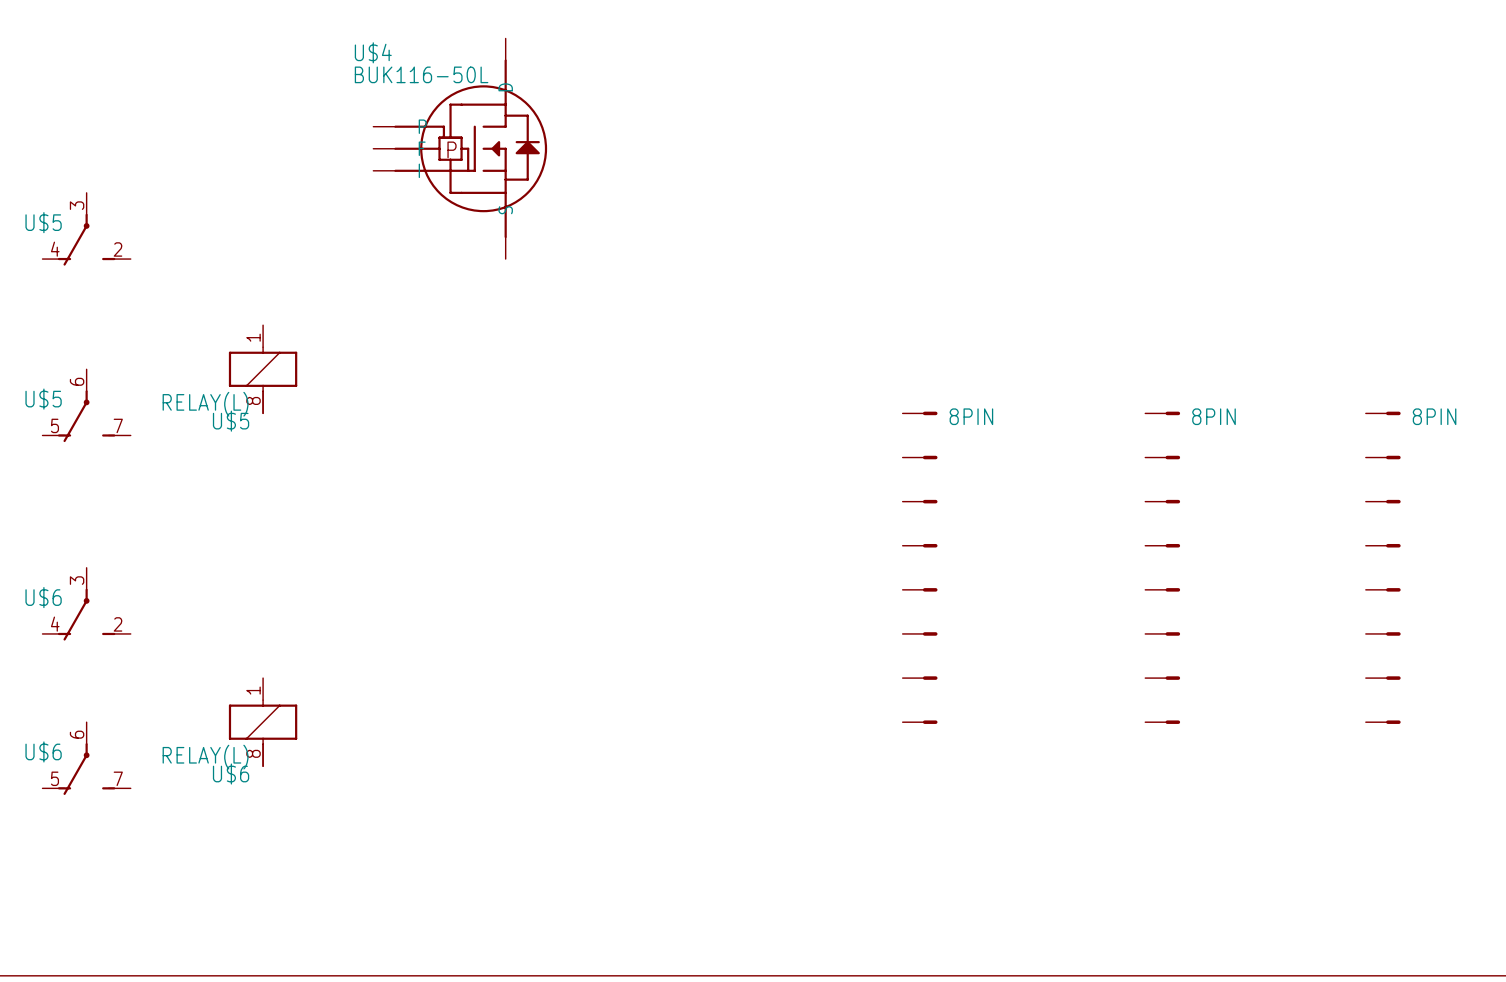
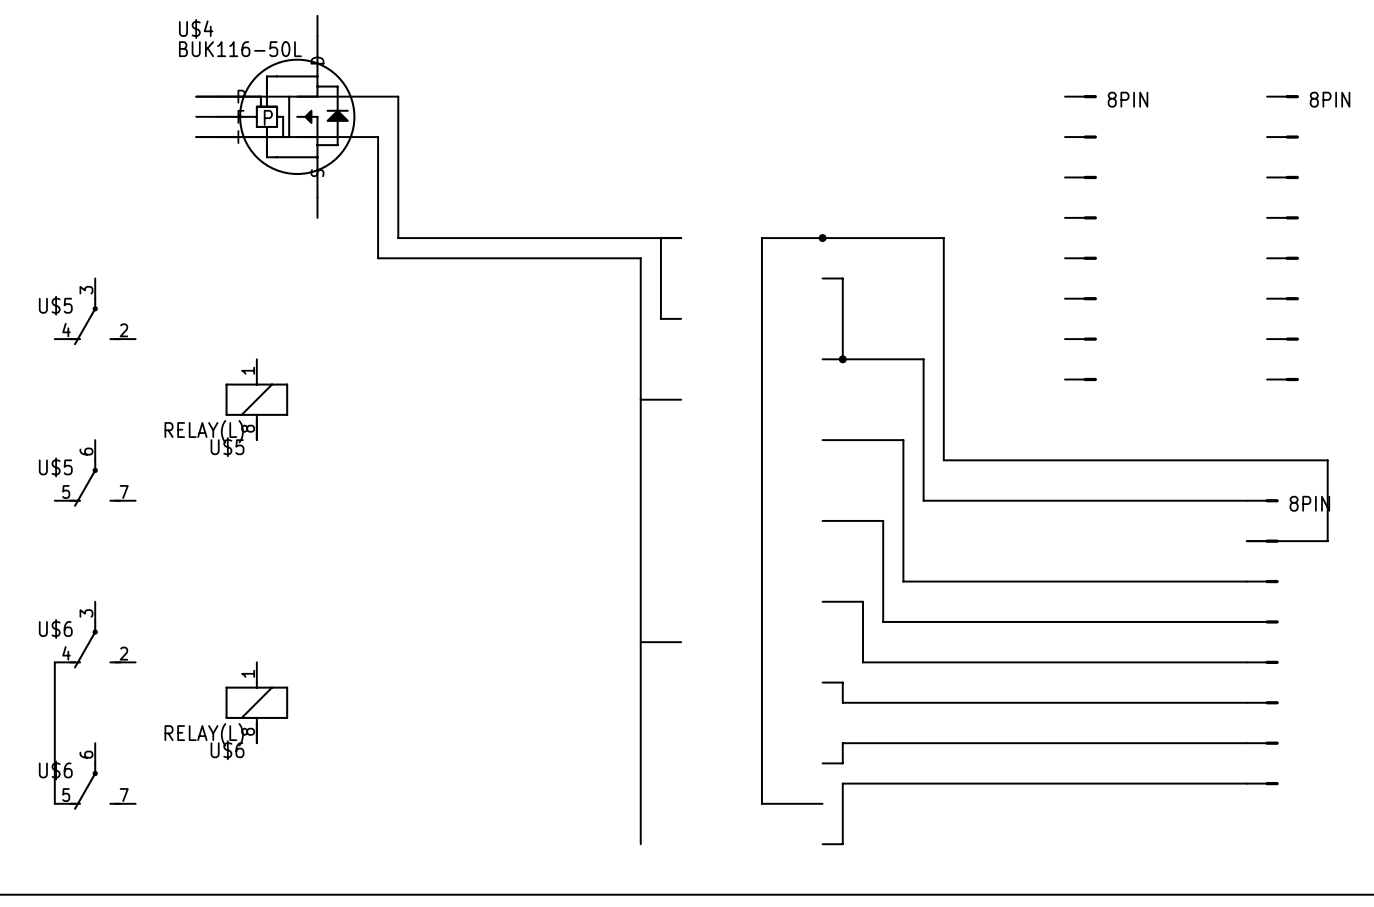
wire: none -> (196, 96) (398, 96) (398, 238) (681, 238)
part: none -> 8PIN (1081, 96)
part: none -> 8PIN (1283, 96)
wire: none -> (196, 137) (378, 137) (378, 258) (640, 258) (640, 399) (681, 399)
U$4 position: (460, 148) -> (275, 116)
part: none -> (1081, 137)
part: none -> (1283, 137)
part: none -> (1081, 177)
part: none -> (1283, 177)
U$5 position: (86, 229) -> (95, 311)
part: none -> (1081, 217)
part: none -> (1283, 217)
wire: none -> (660, 238) (660, 318) (681, 318)
junction: none -> (822, 238)
part: none -> (1081, 258)
part: none -> (1283, 258)
wire: none -> (822, 278) (842, 278) (842, 359)
part: none -> (1081, 298)
part: none -> (1283, 298)
U$5 position: (263, 369) -> (256, 400)
part: none -> (1081, 339)
part: none -> (1283, 339)
wire: none -> (822, 359) (923, 359) (923, 500) (1246, 500)
junction: none -> (842, 359)
U$5 position: (86, 405) -> (95, 473)
part: 8PIN (920, 413) -> none
part: 8PIN (1162, 413) -> none
part: none -> (1081, 379)
part: 8PIN (1383, 413) -> none
part: none -> (1283, 379)
bus: none -> (640, 399) (640, 844)
part: (920, 457) -> none
part: (1162, 457) -> none
part: (1383, 457) -> none
wire: none -> (822, 440) (903, 440) (903, 581) (1246, 581)
part: (920, 501) -> none
part: (1162, 501) -> none
part: (1383, 501) -> none
part: (920, 545) -> none
part: (1162, 545) -> none
part value: none -> 8PIN (1309, 503)
wire: none -> (822, 520) (883, 520) (883, 621) (1246, 621)
part: (920, 589) -> none
part: (1162, 589) -> none
wire: none -> (1246, 541) (1327, 541) (1327, 460) (943, 460) (943, 238) (761, 238) (761, 803) (822, 803)
U$6 position: (86, 604) -> (95, 635)
part: (920, 633) -> none
part: (1162, 633) -> none
wire: none -> (822, 601) (862, 601) (862, 662) (1246, 662)
part: (920, 678) -> none
part: (1162, 678) -> none
wire: none -> (640, 642) (681, 642)
wire: none -> (54, 662) (54, 803)
U$6 position: (263, 722) -> (256, 703)
part: (920, 722) -> none
part: (1162, 722) -> none
wire: none -> (822, 682) (842, 682) (842, 702) (1246, 702)
U$6 position: (86, 758) -> (95, 776)
part: none -> (1262, 702)
wire: none -> (1246, 743) (842, 743) (842, 763) (822, 763)
part: none -> (1262, 743)
wire: none -> (1246, 783) (842, 783) (842, 844) (822, 844)
part: none -> (1262, 783)

